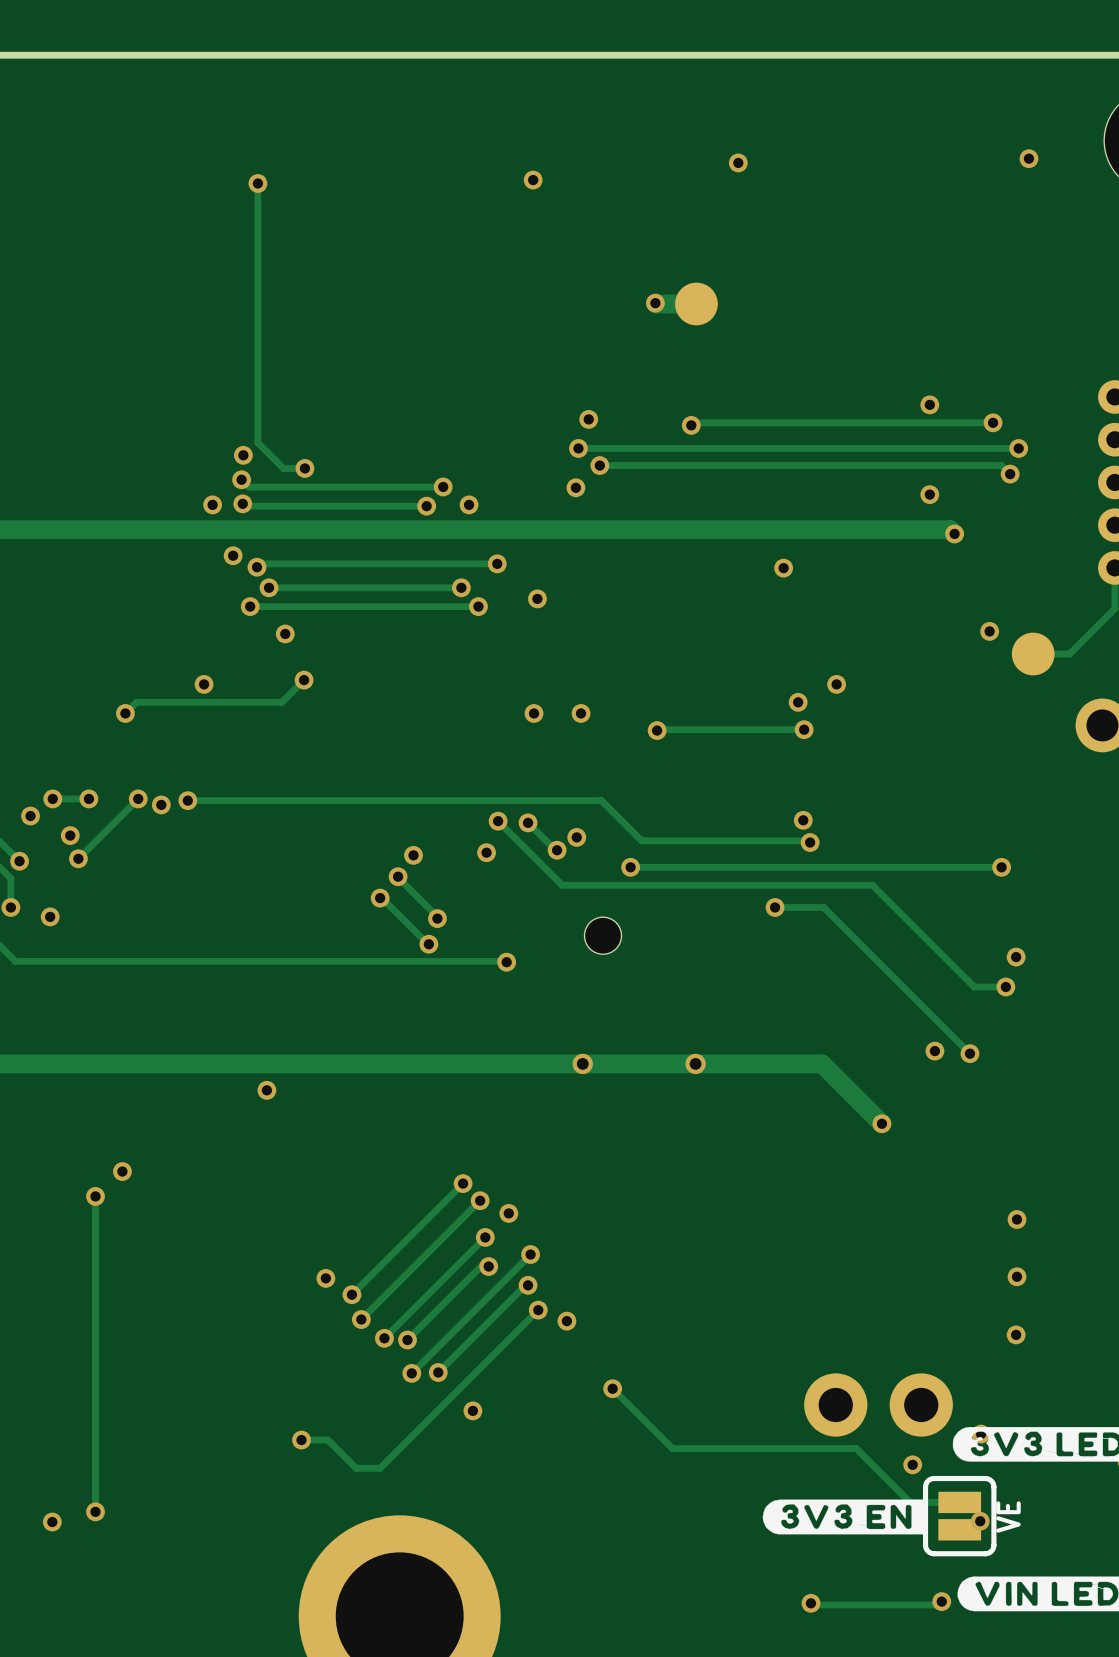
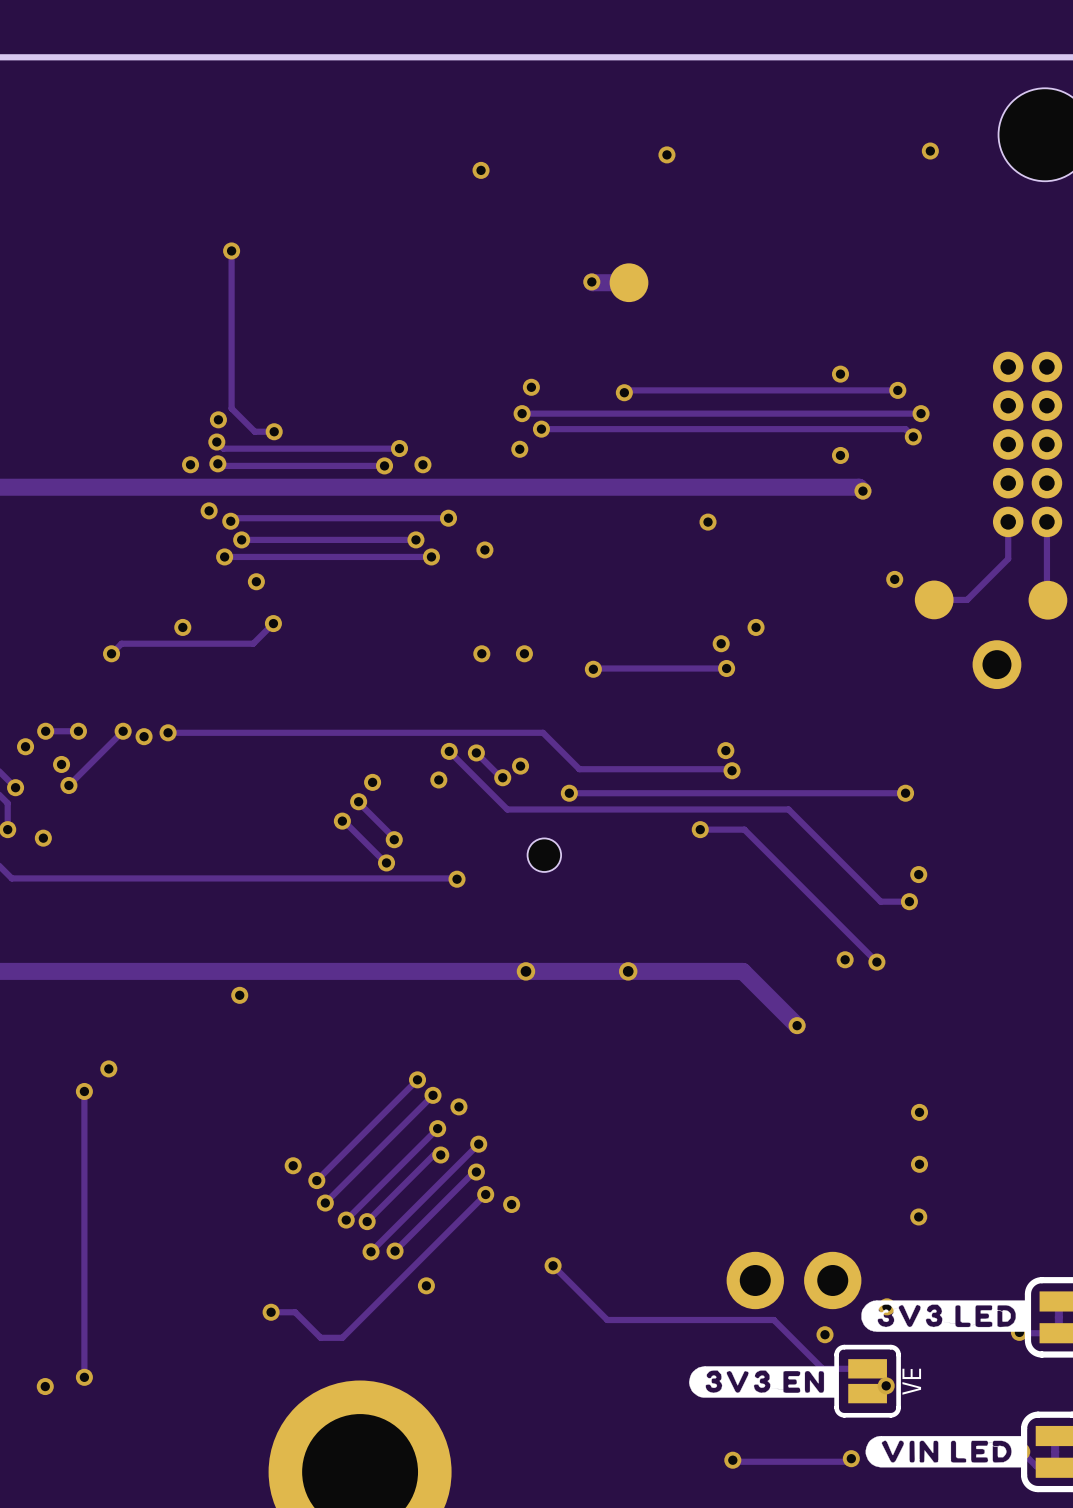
track: (257, 183) (257, 268) -> none
via position: (257, 183) -> (231, 250)

